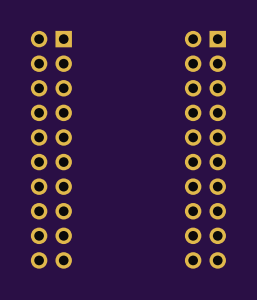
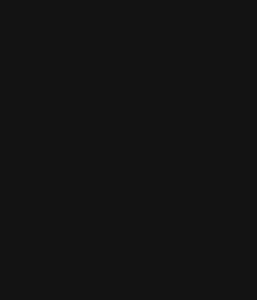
part: (51, 149) -> none
part: (205, 149) -> none

